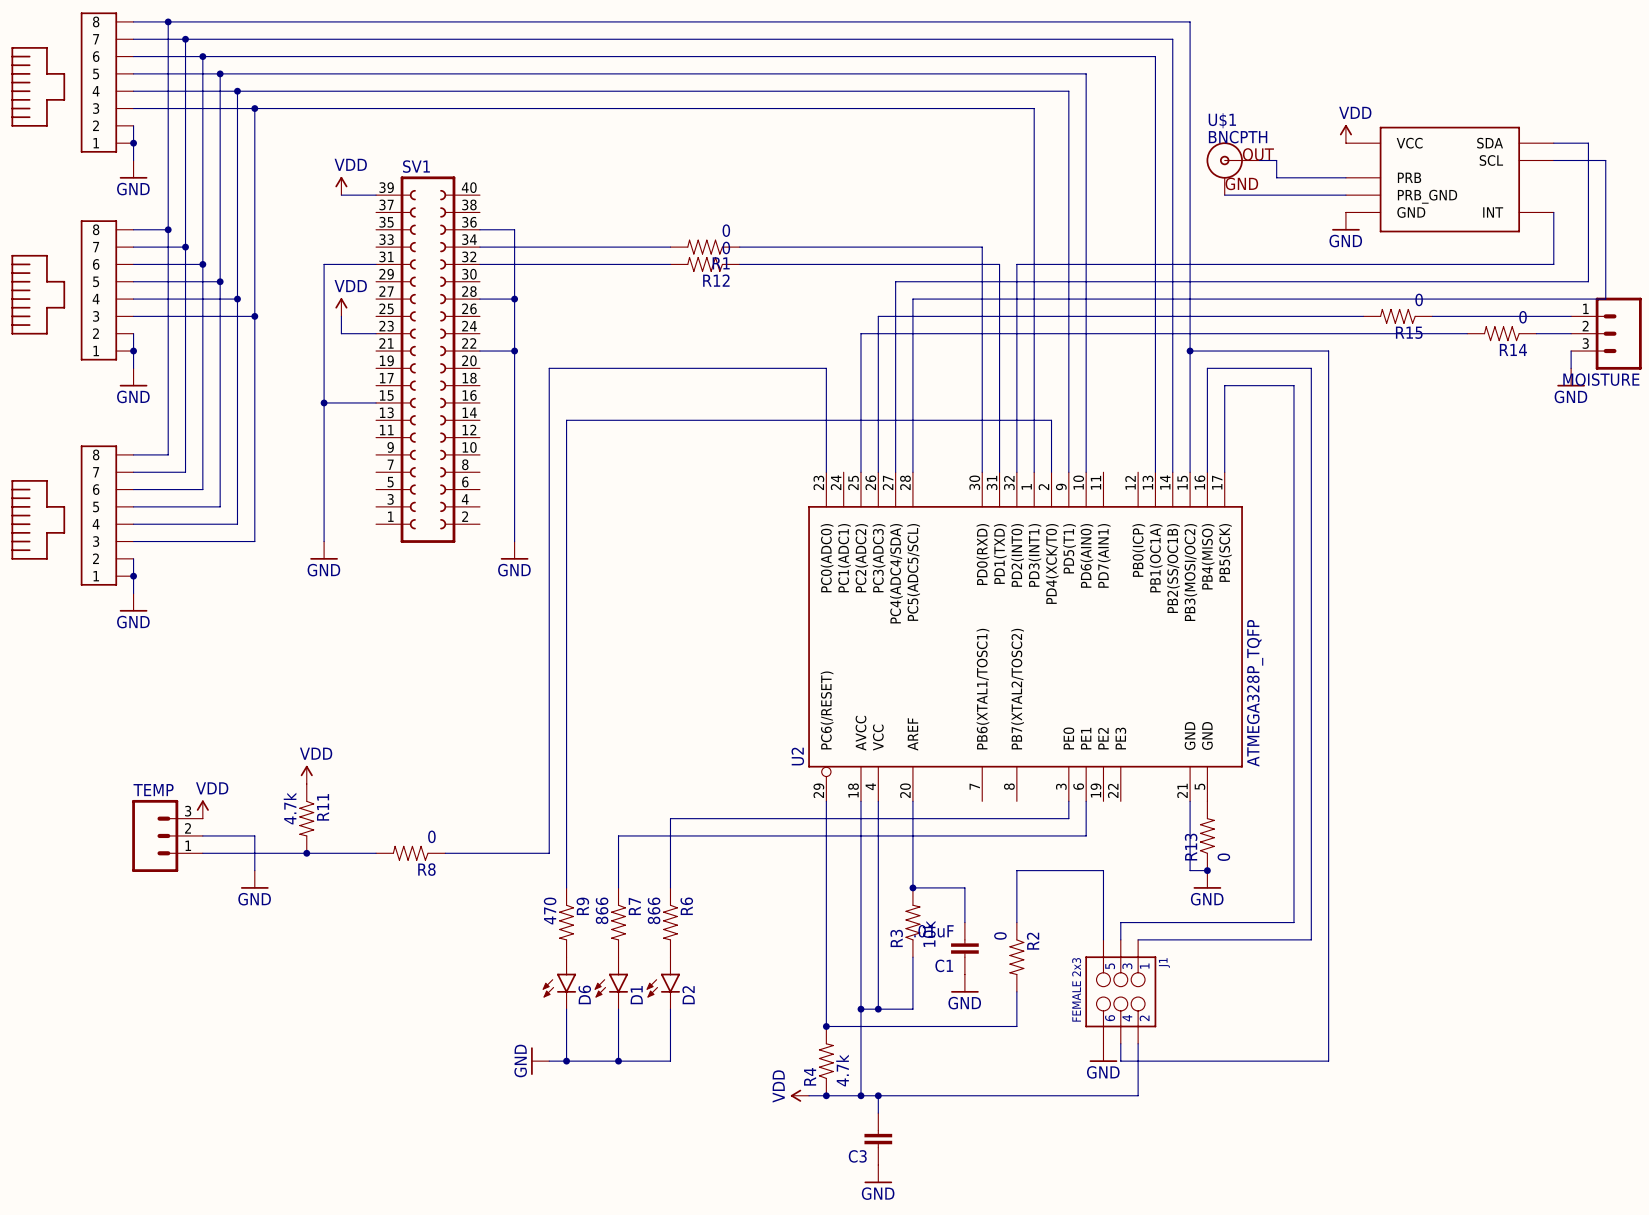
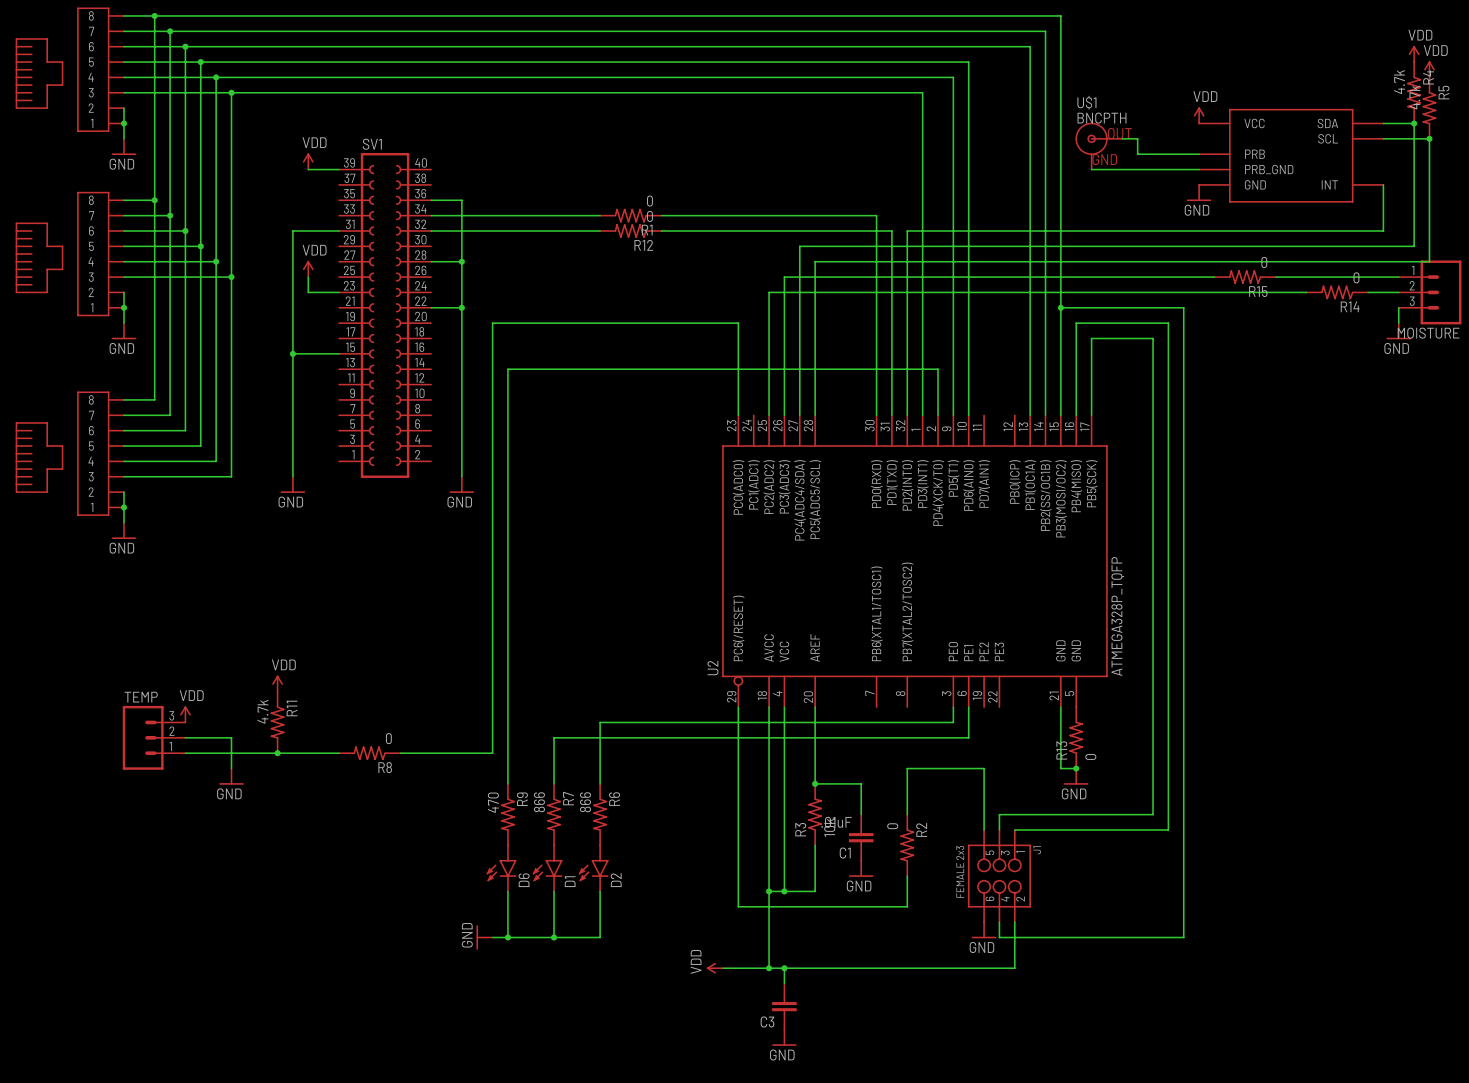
power symbol: none -> VDD (1414, 53)
power symbol: none -> VDD (1429, 69)
R5: none -> 4.7k (1429, 108)
junction: none -> (1414, 123)
junction: none -> (1429, 138)
junction: (826, 1026) -> none
R4 rotation: 0° (826, 1061) -> 180° (1414, 92)
R4 position: (826, 1061) -> (1414, 92)
junction: (826, 1095) -> none

